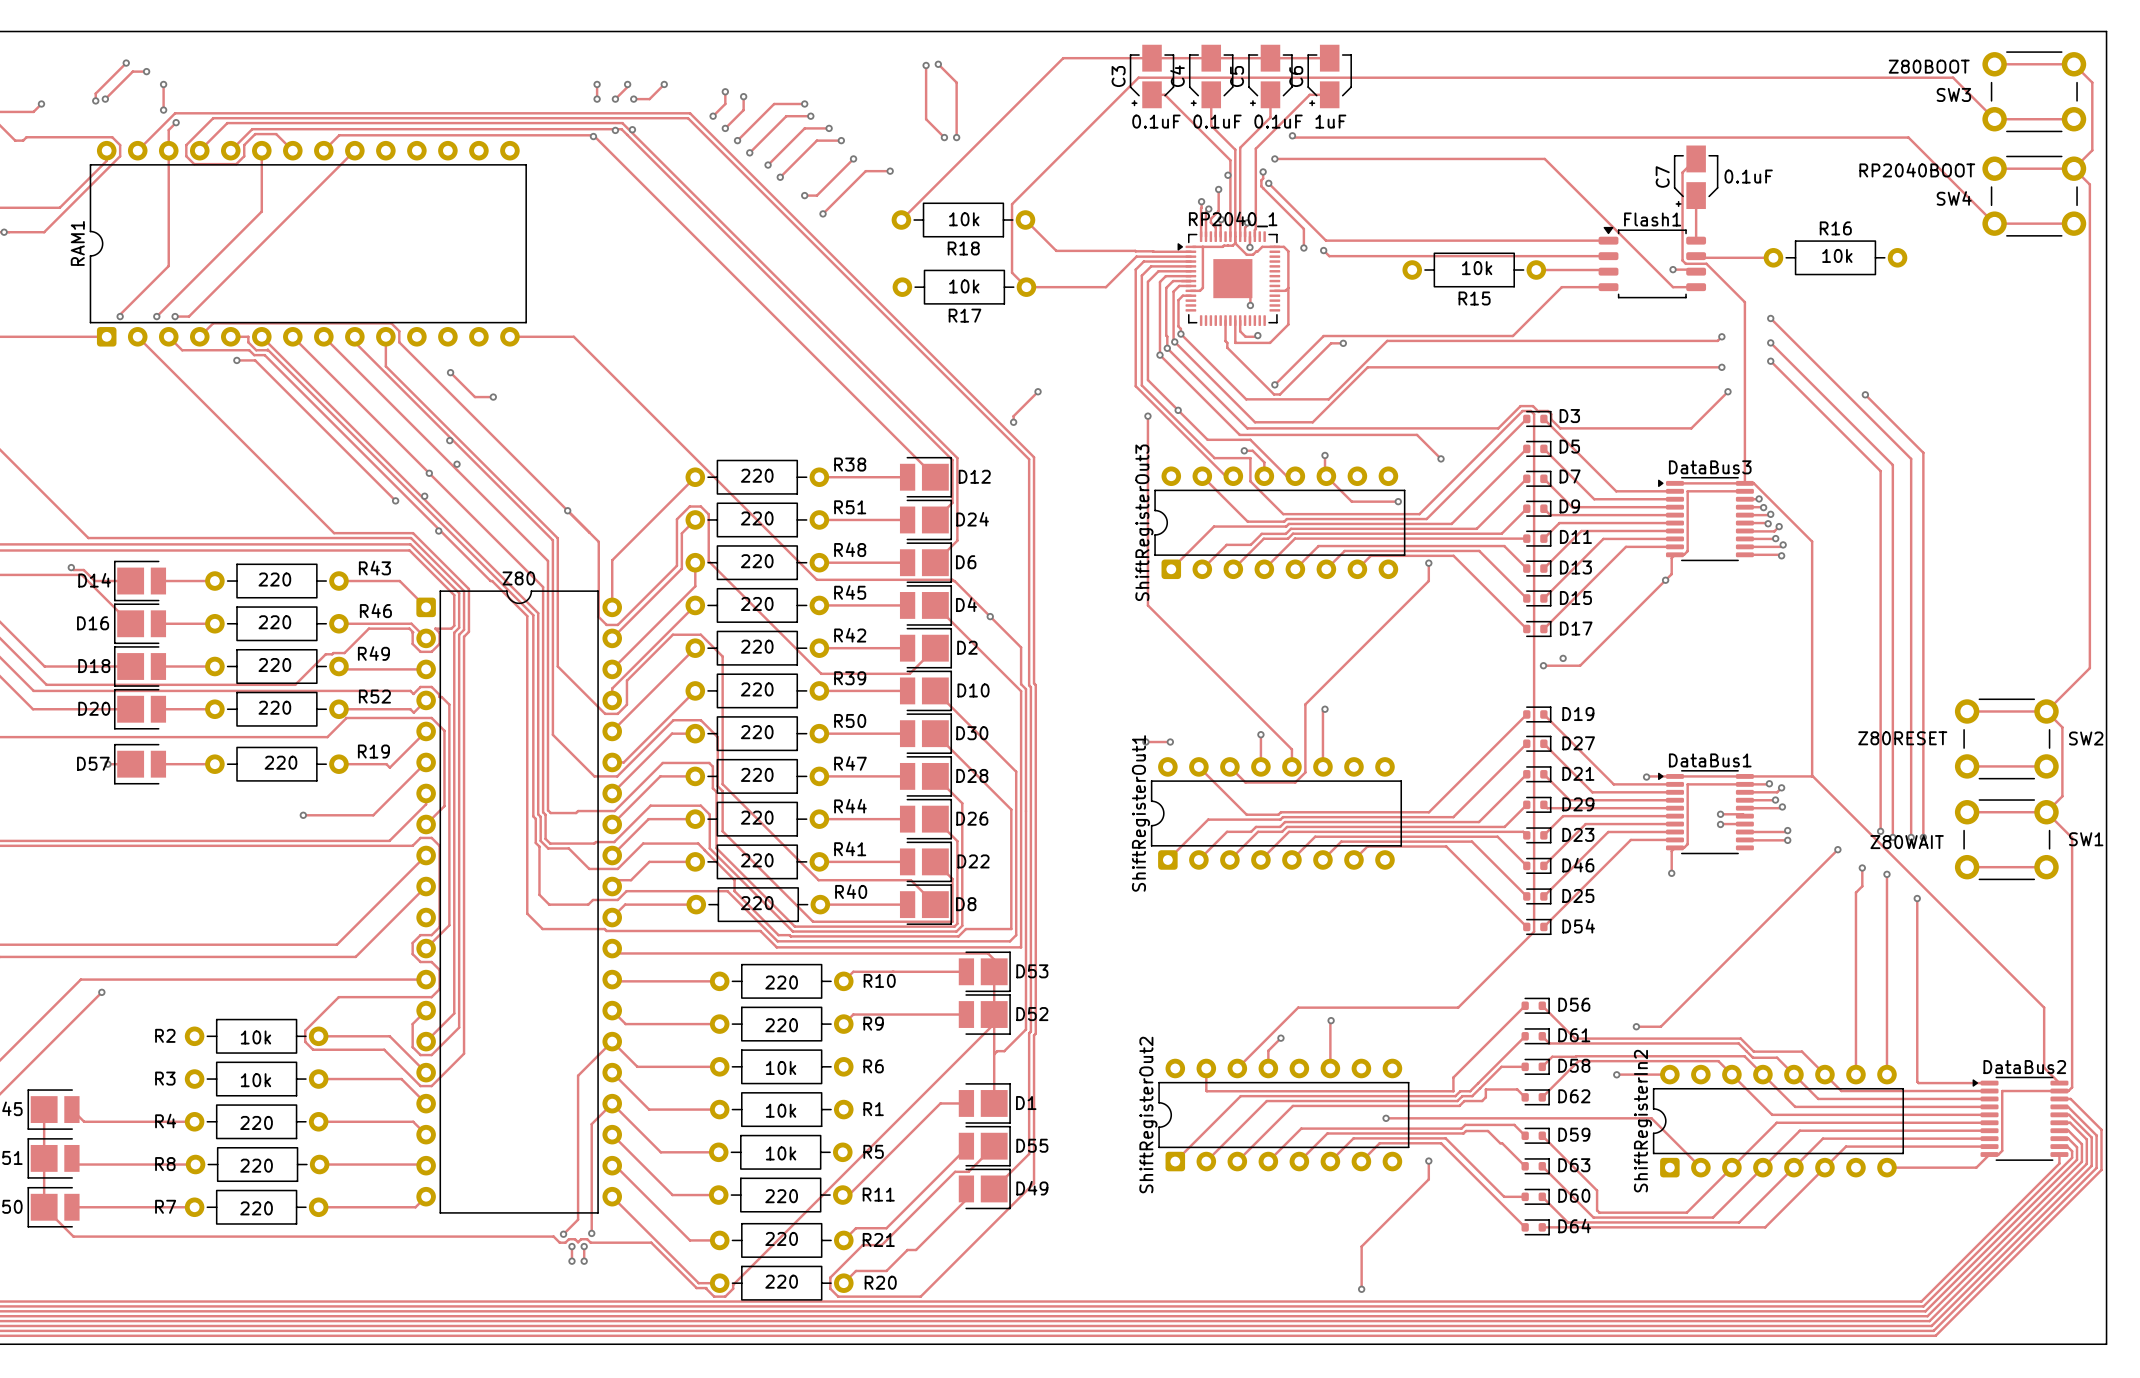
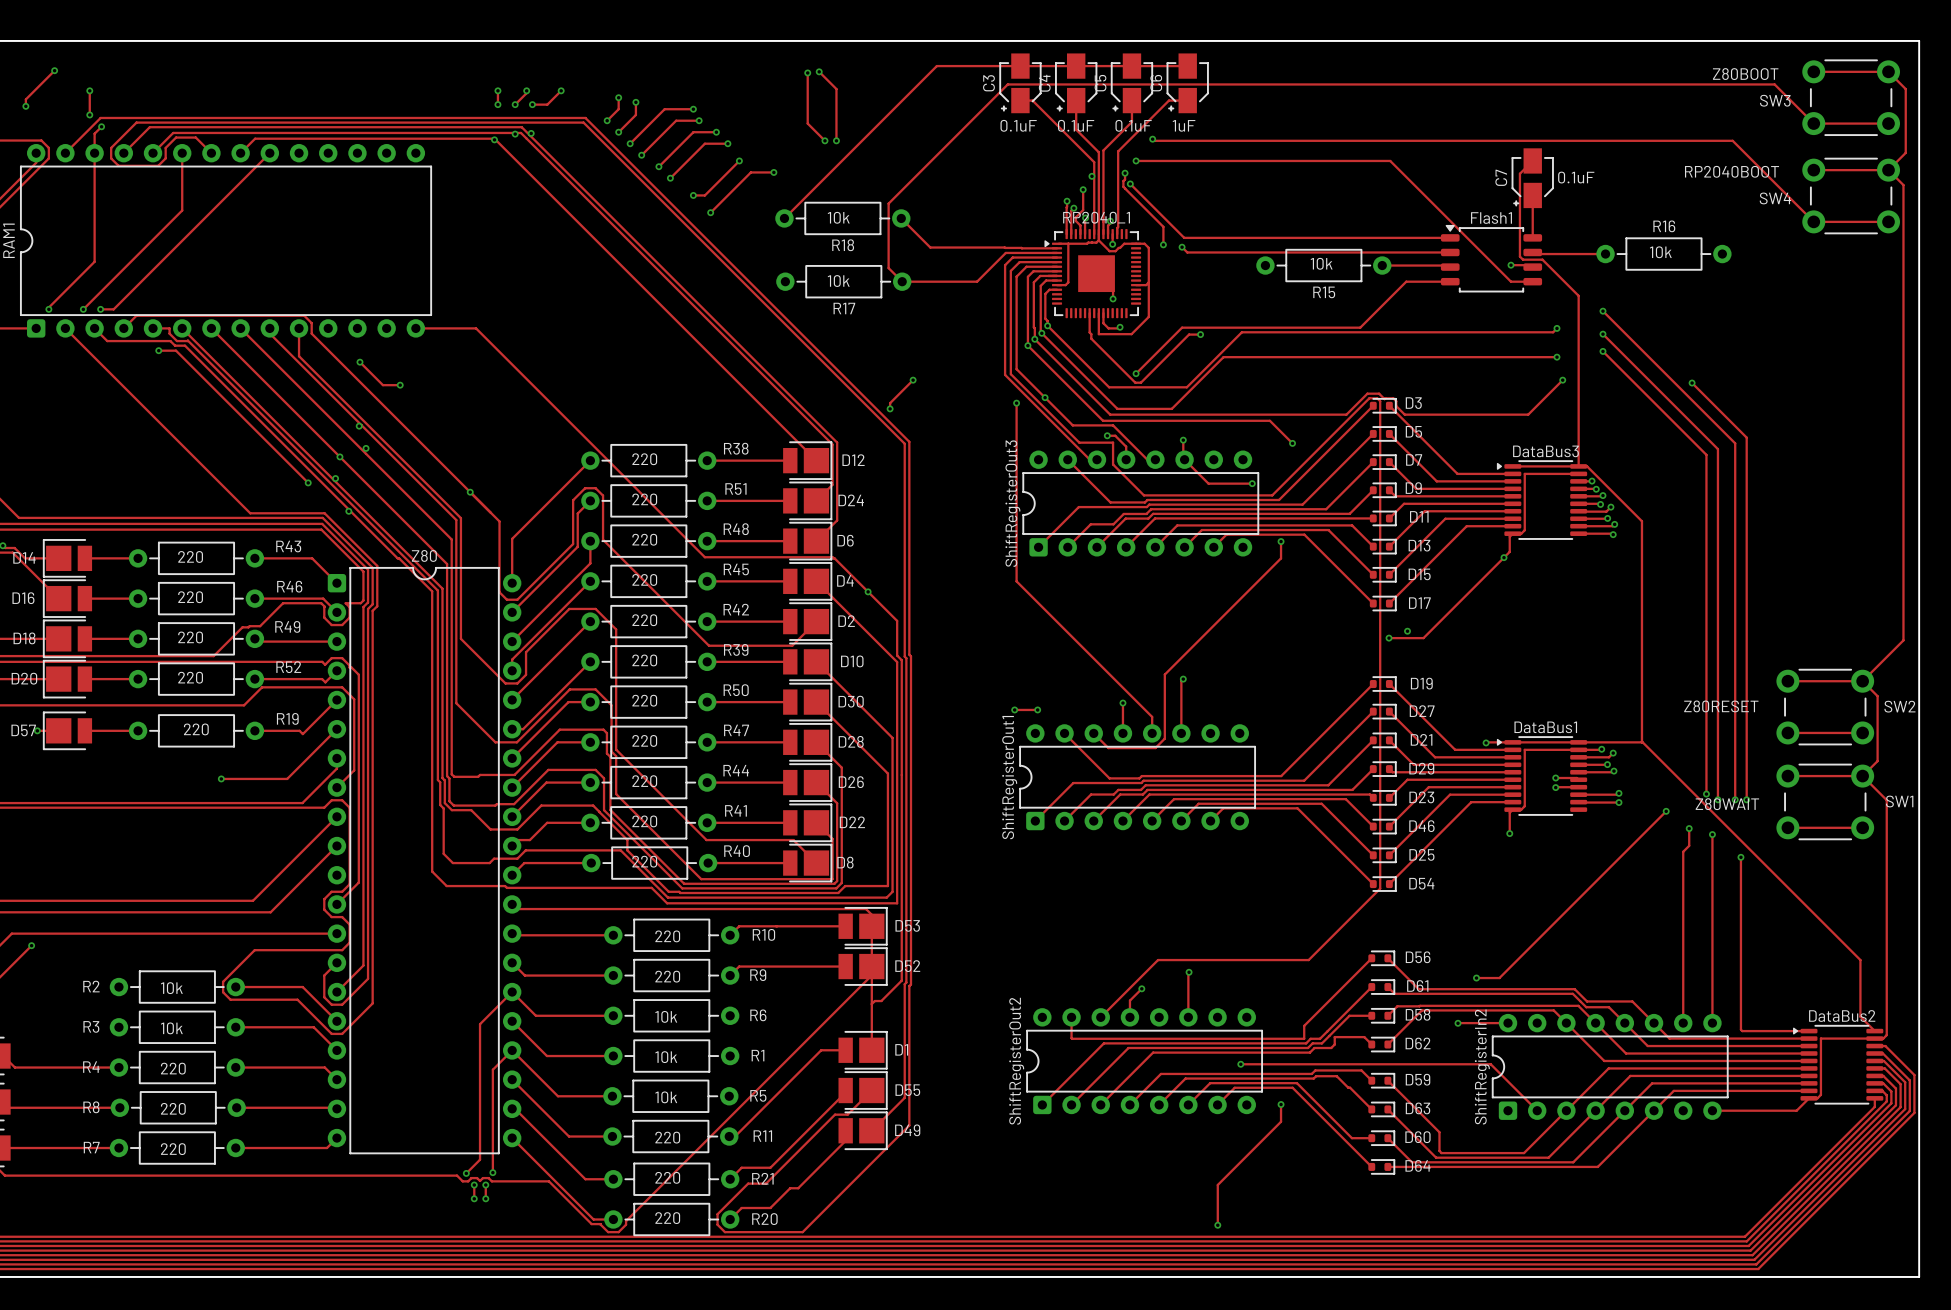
track: (146, 71) (132, 71) (105, 99) -> none
via: (146, 71) -> none
via: (105, 99) -> none

